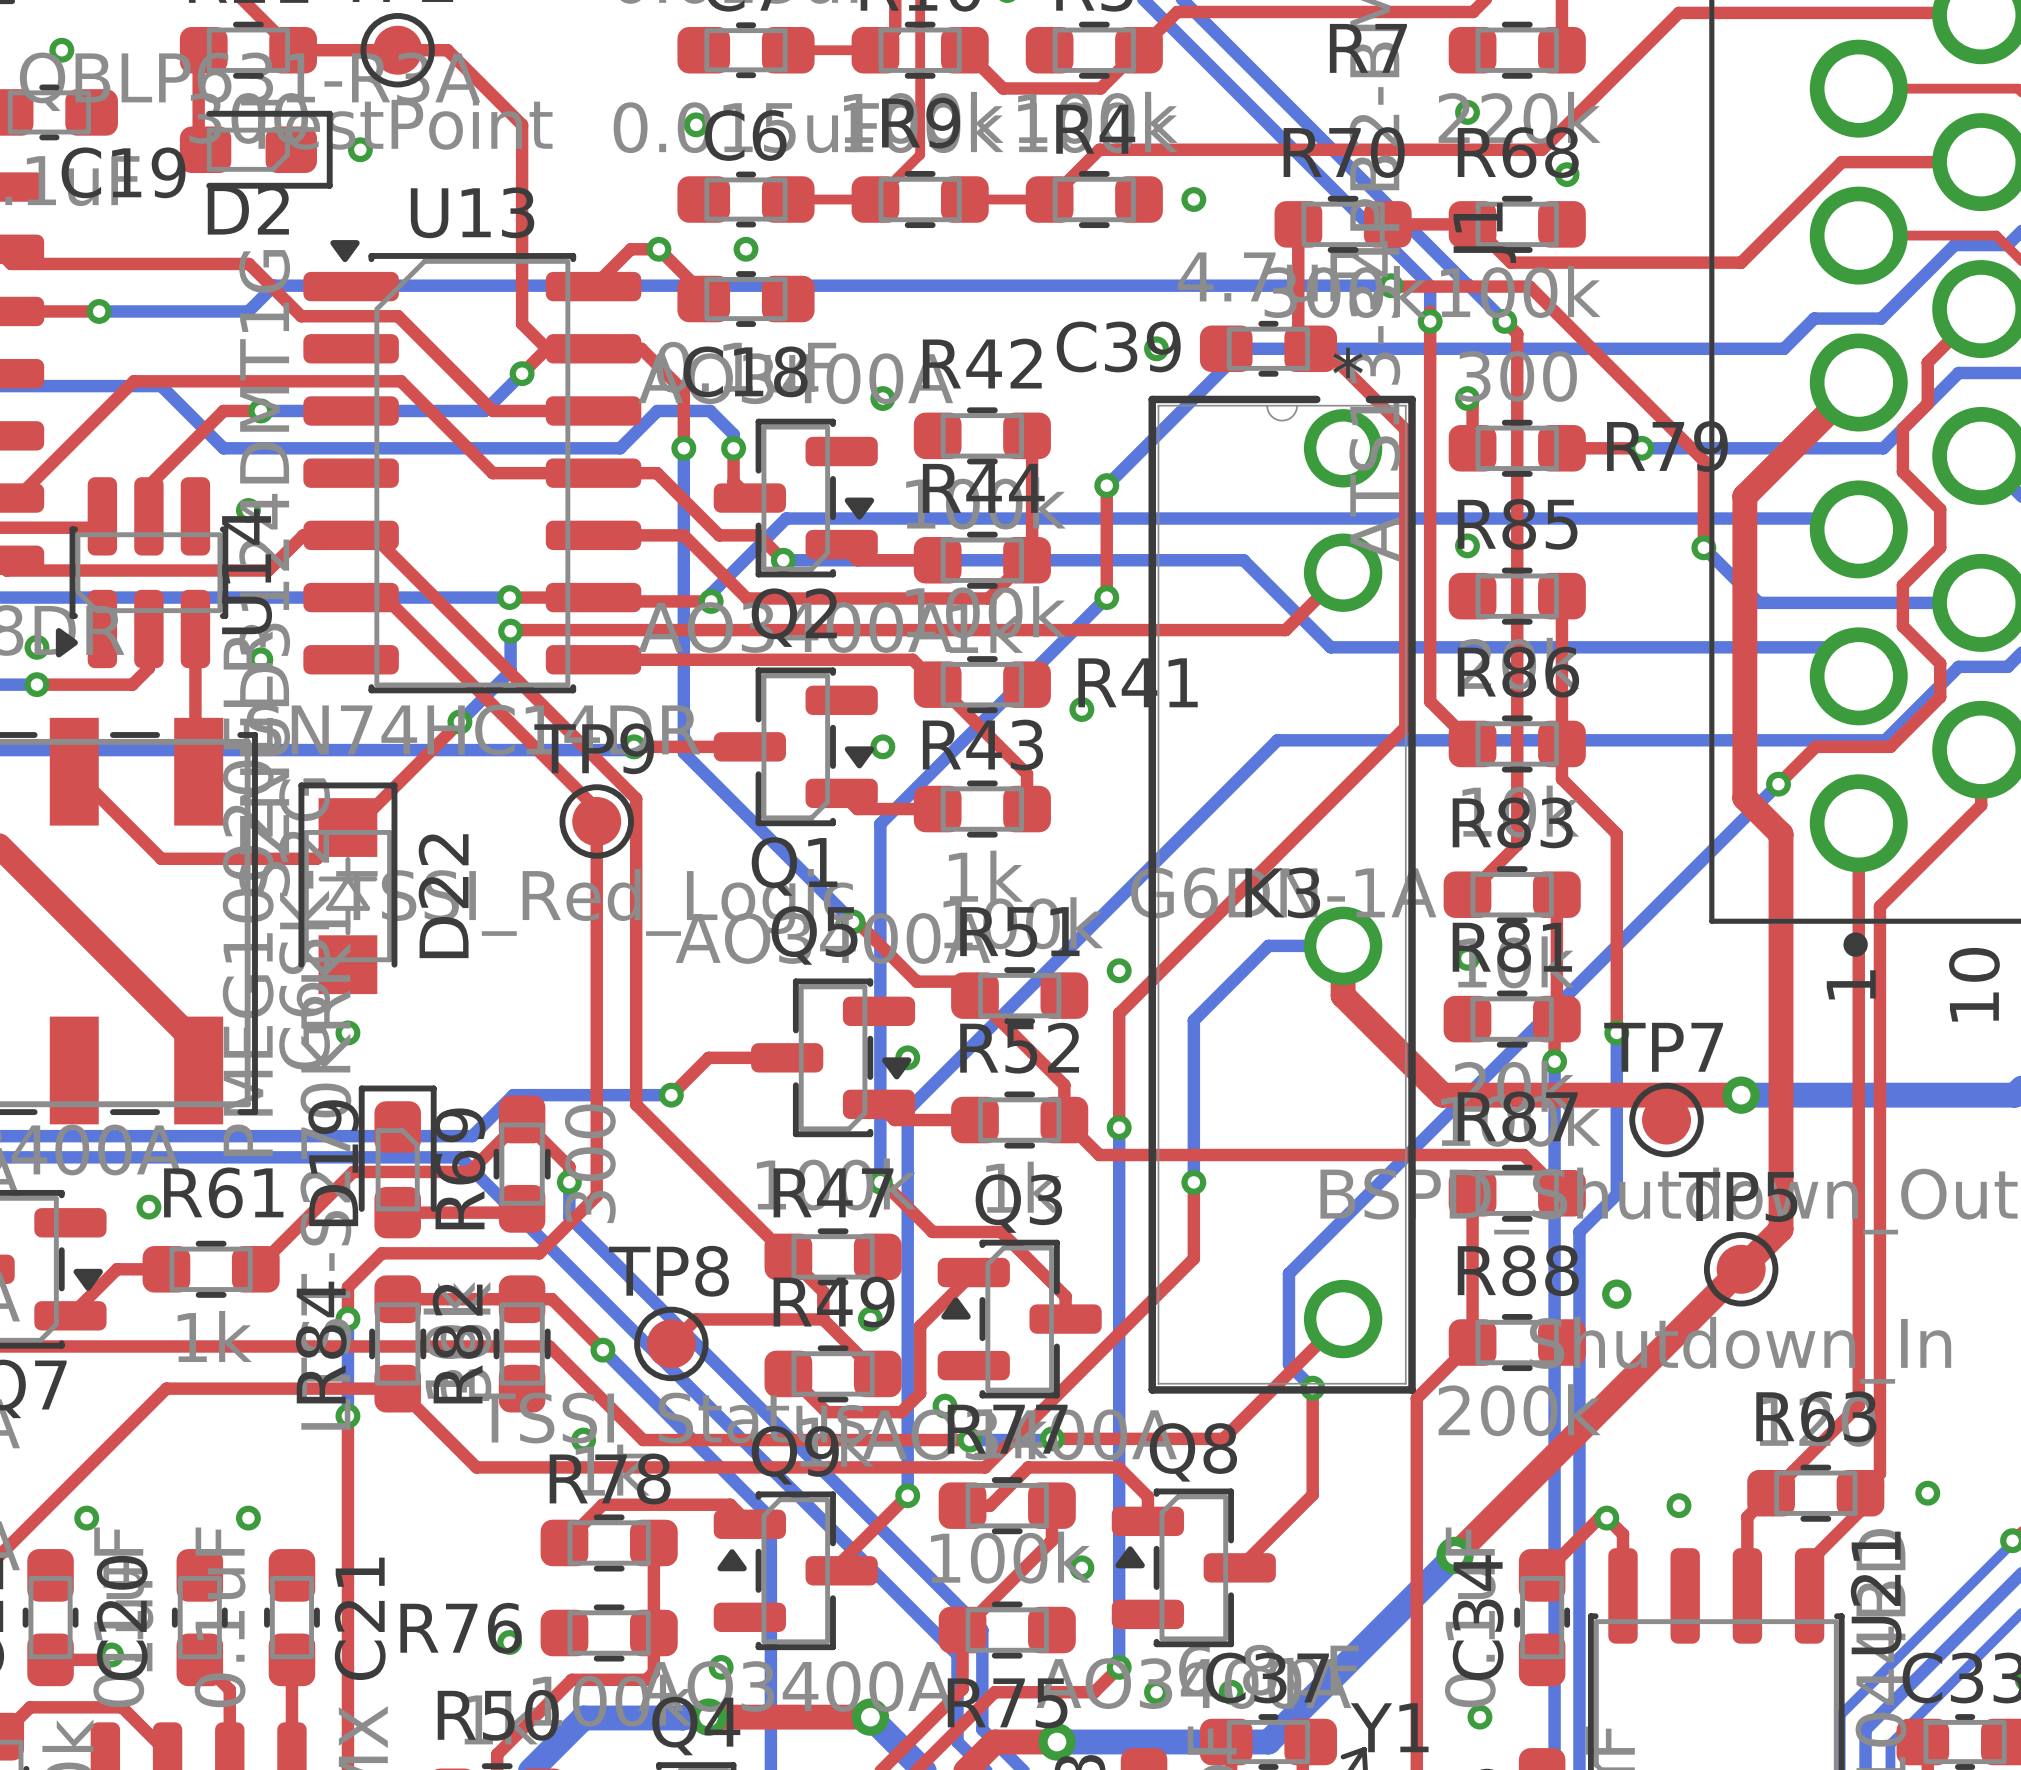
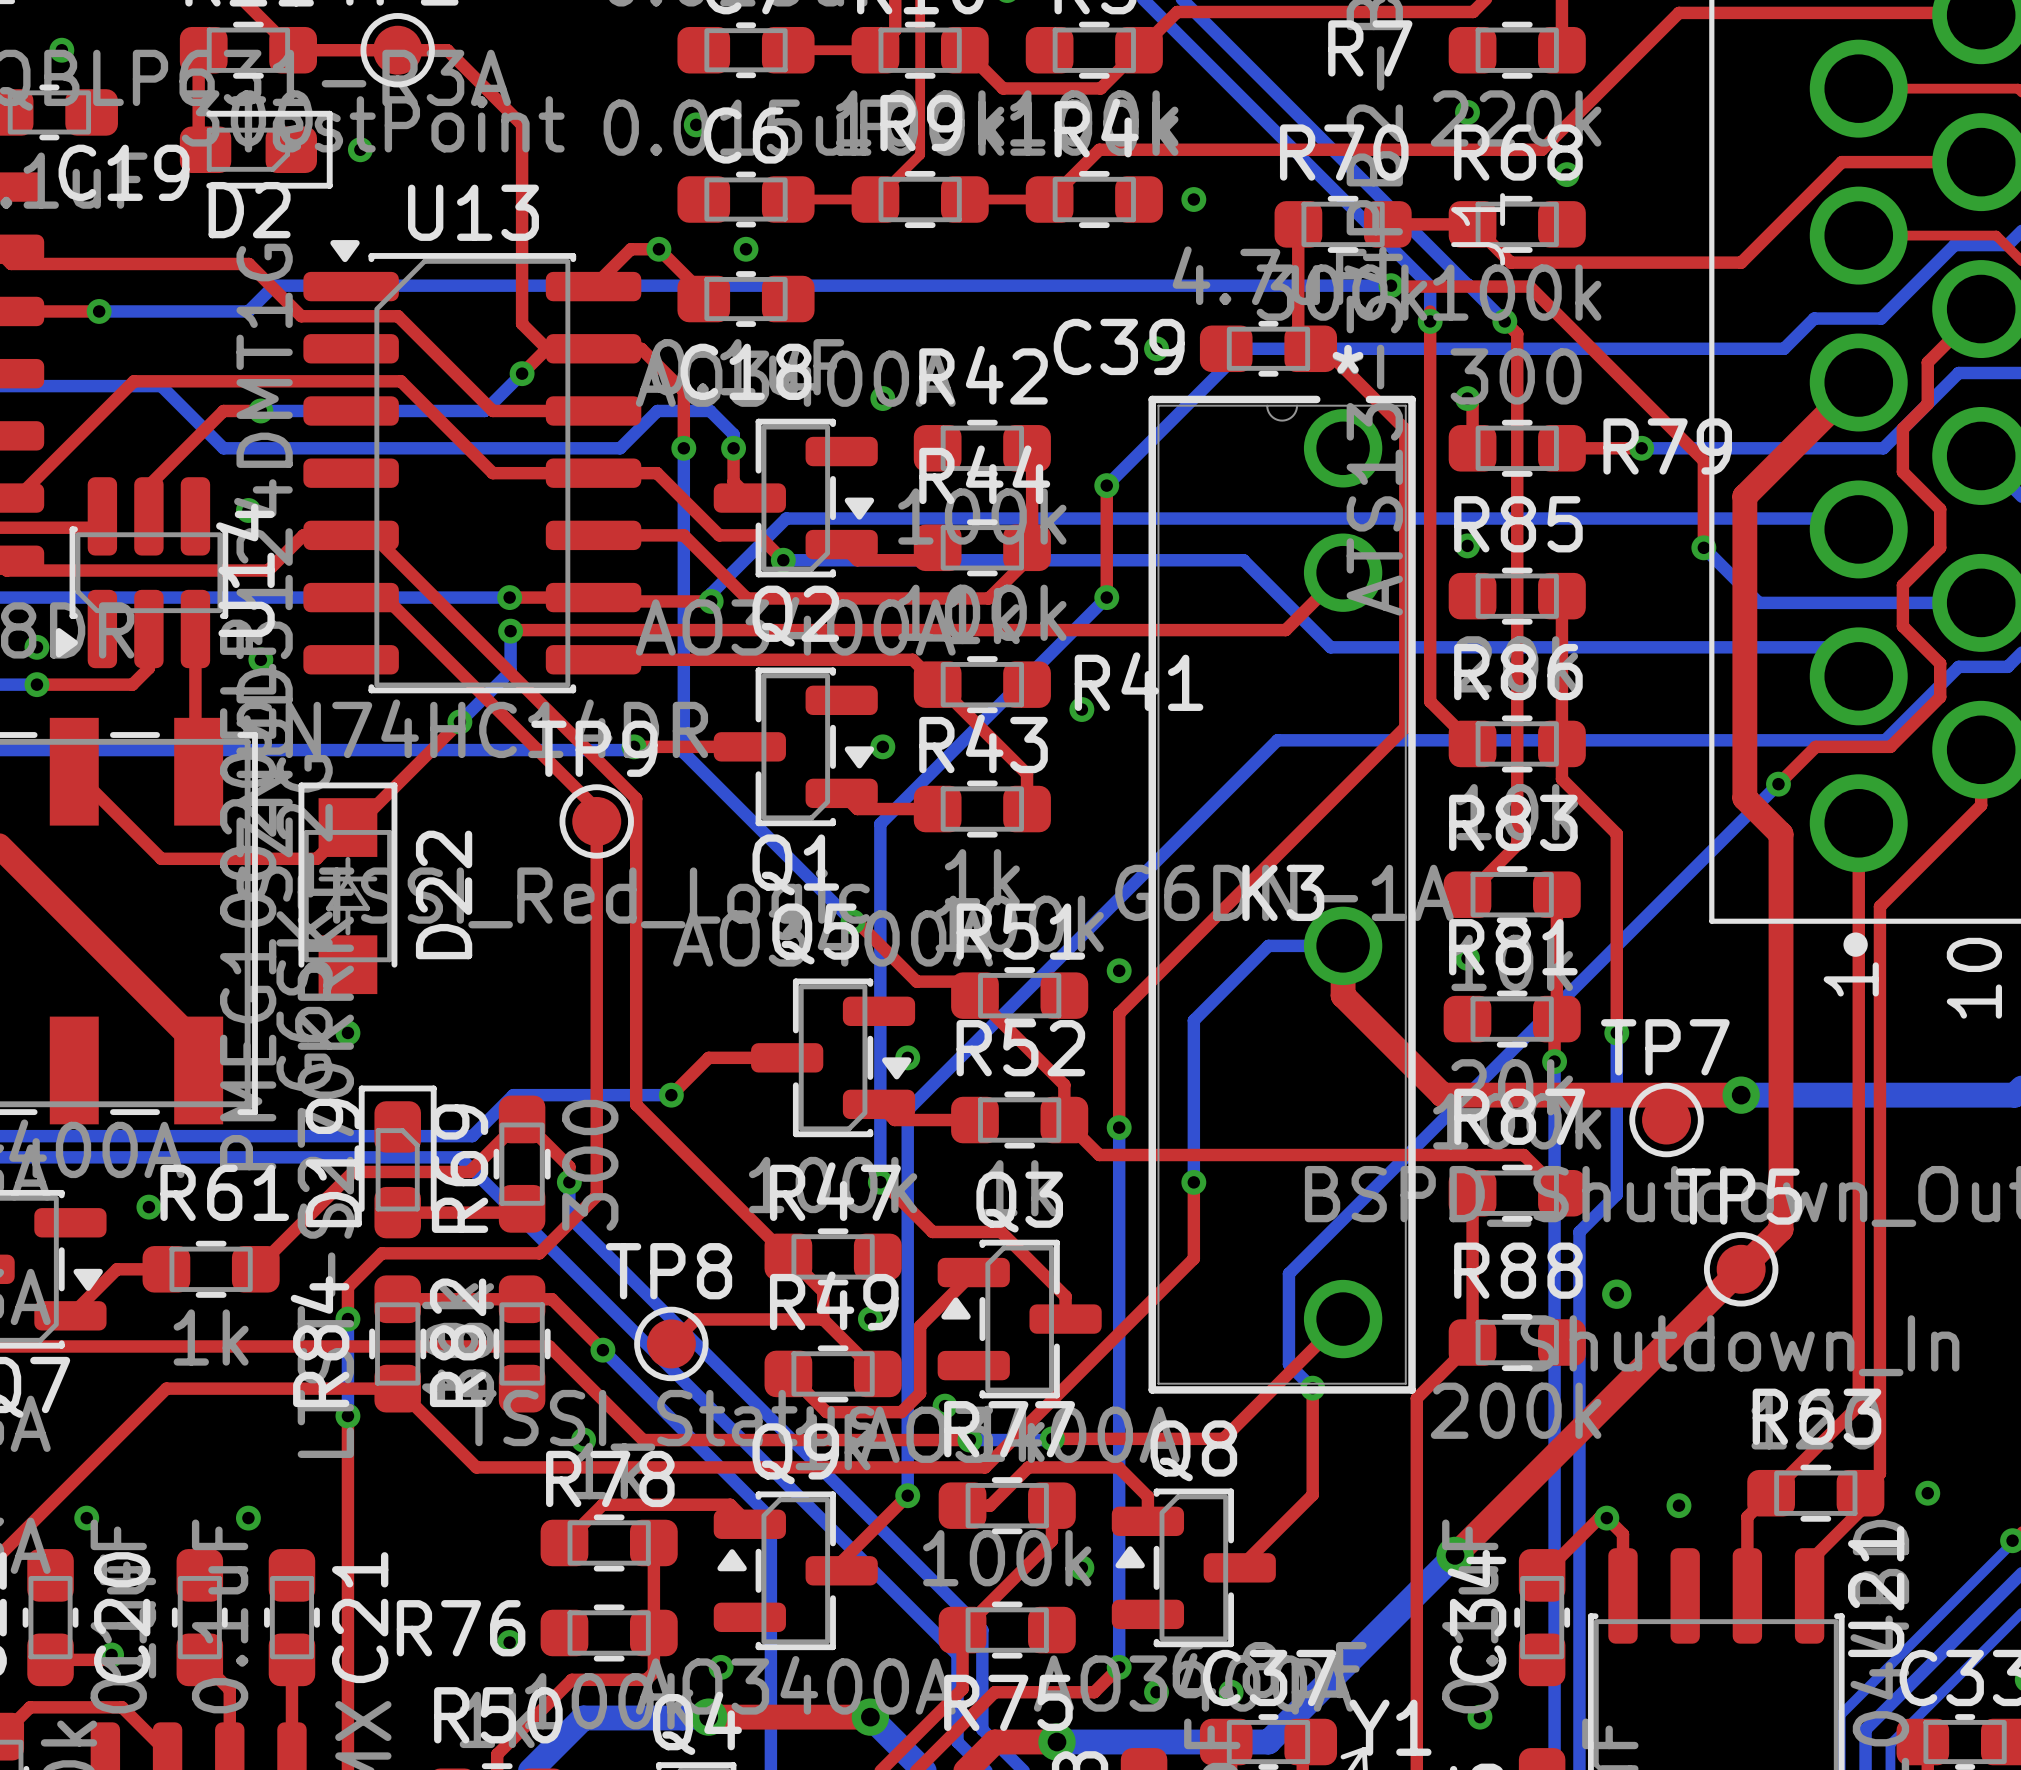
R42 position: (982, 435) -> (982, 448)
R44 position: (982, 560) -> (982, 547)

